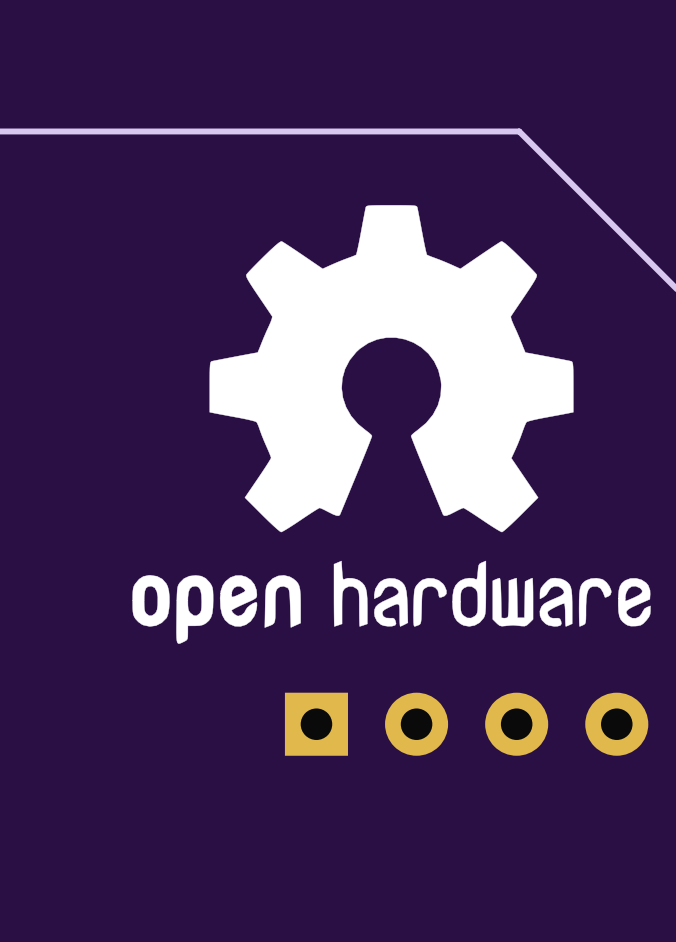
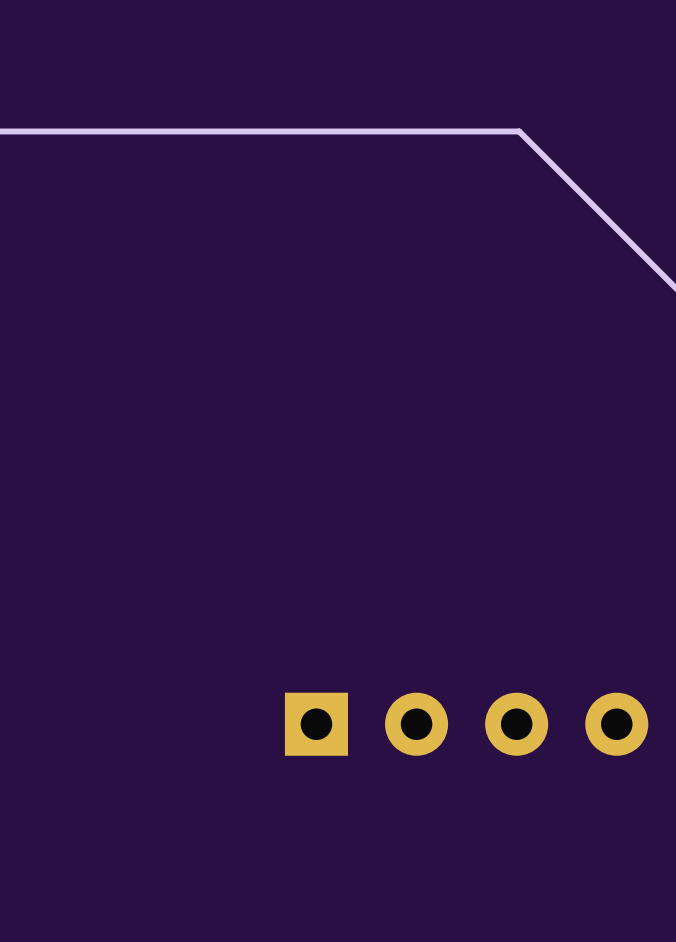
drawing: [132, 205, 651, 644] -> none

